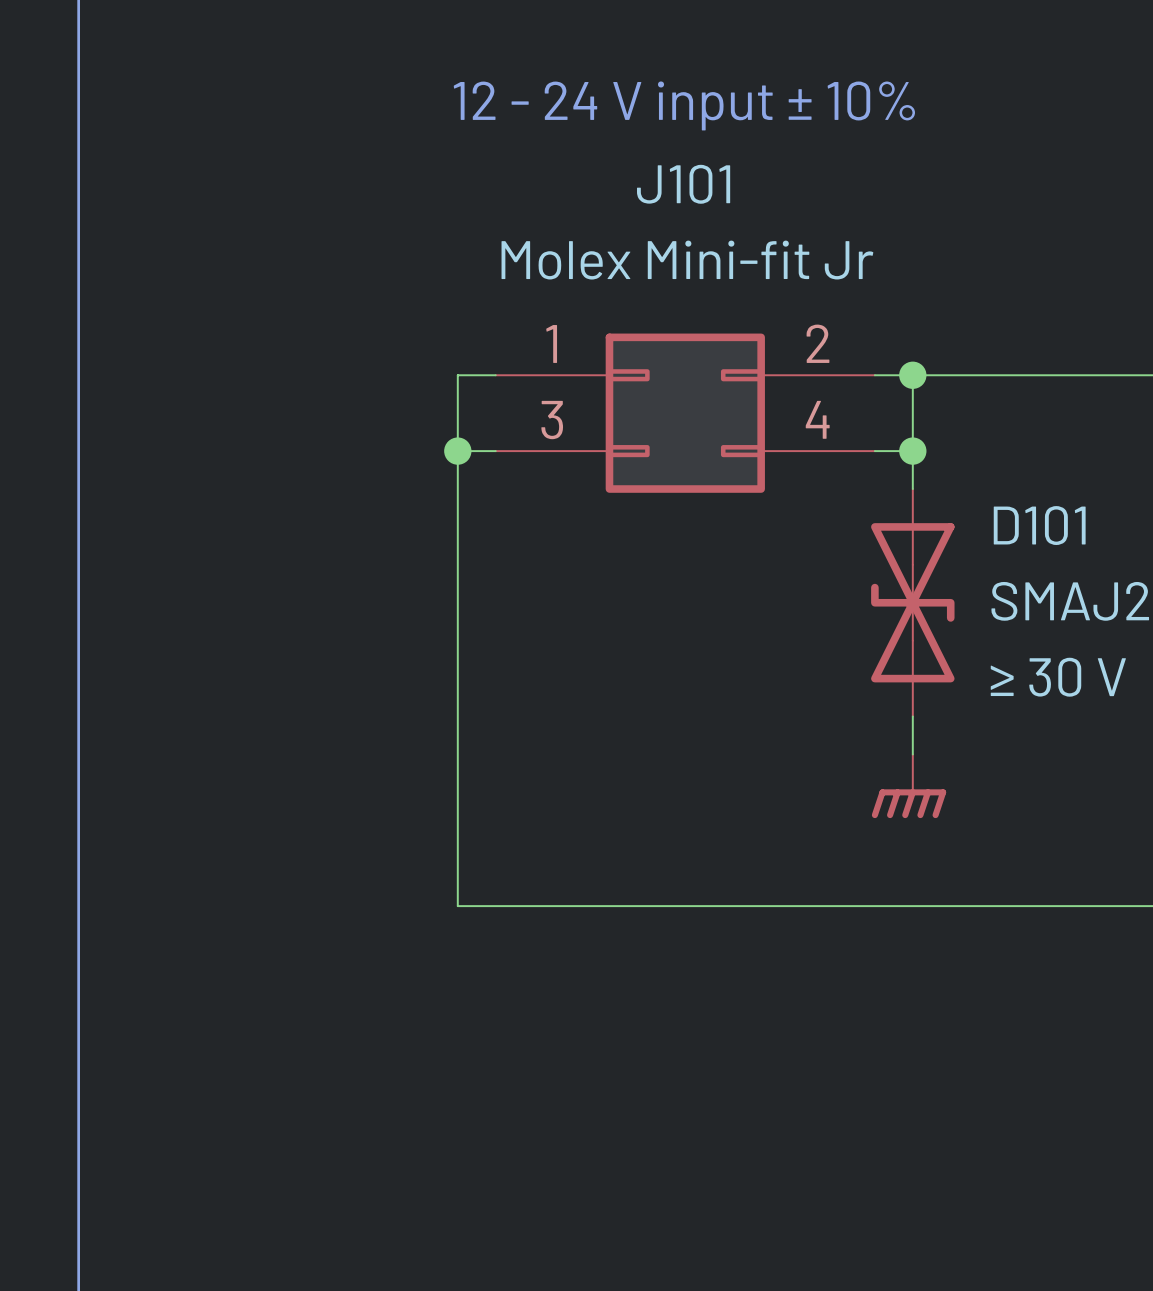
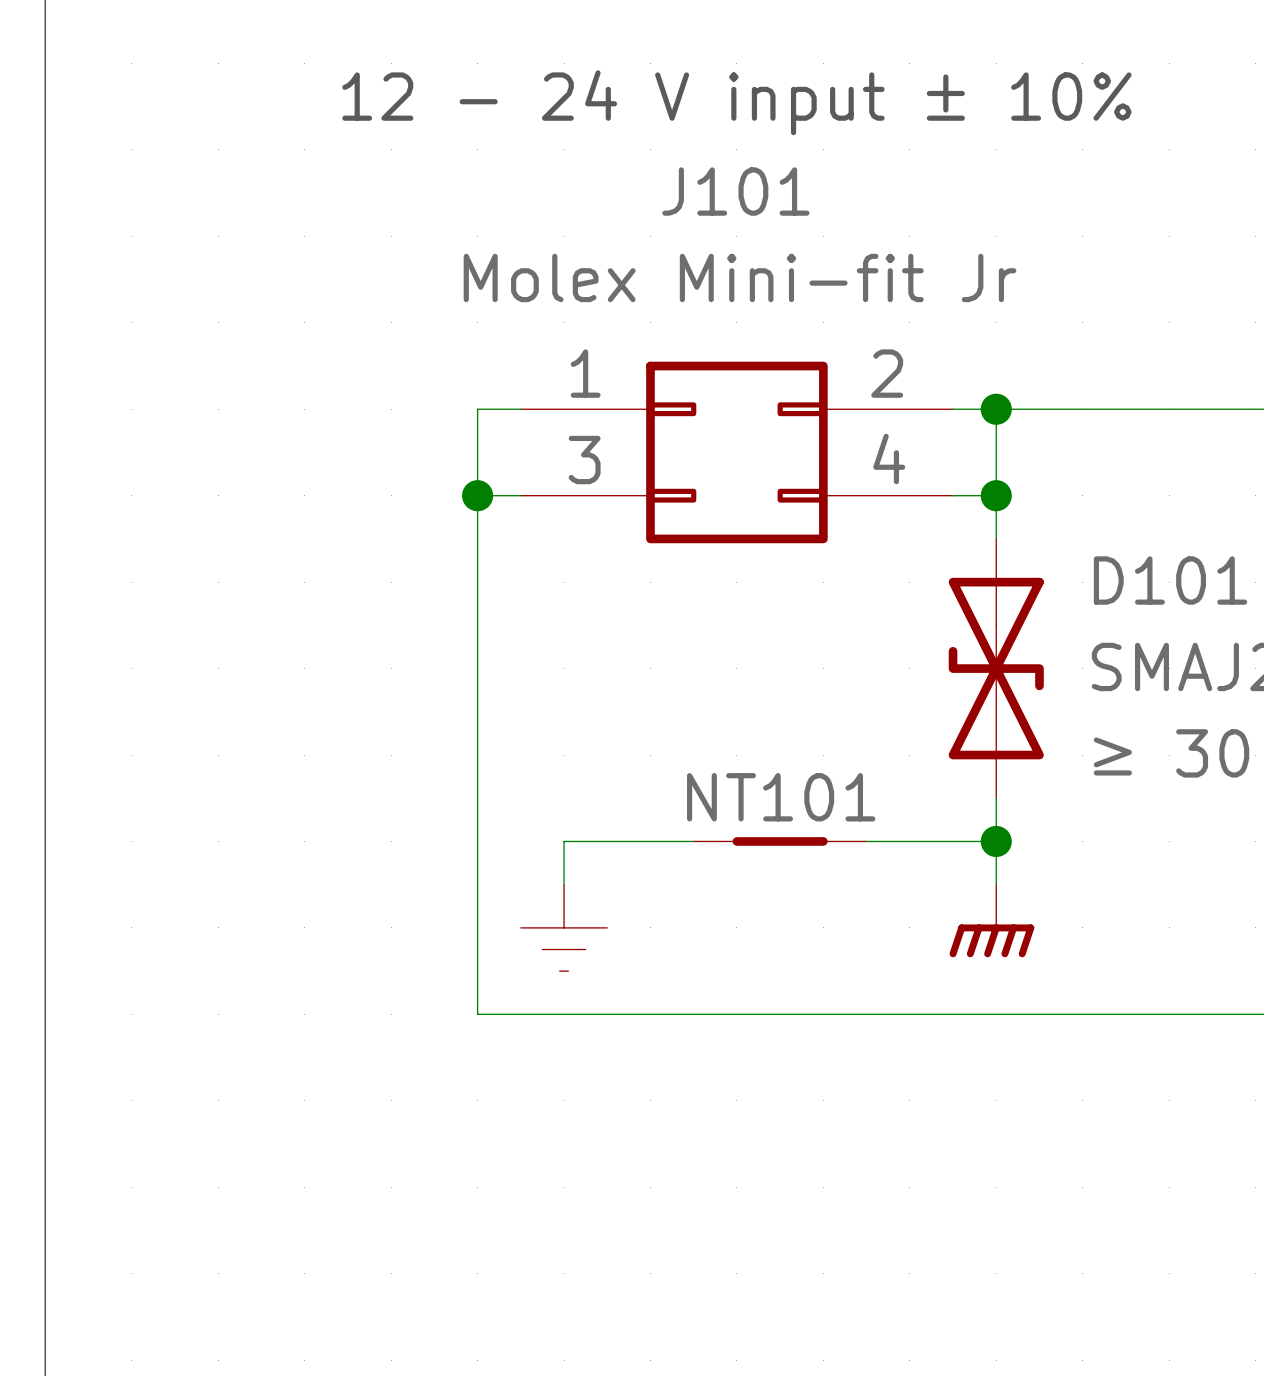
wire: none -> (693, 841) (564, 841) (564, 884)
NT101: none -> (780, 841)
wire: none -> (866, 841) (996, 841) (996, 884)
junction: none -> (996, 841)
power symbol position: (909, 786) -> (991, 920)
power symbol: none -> (564, 927)

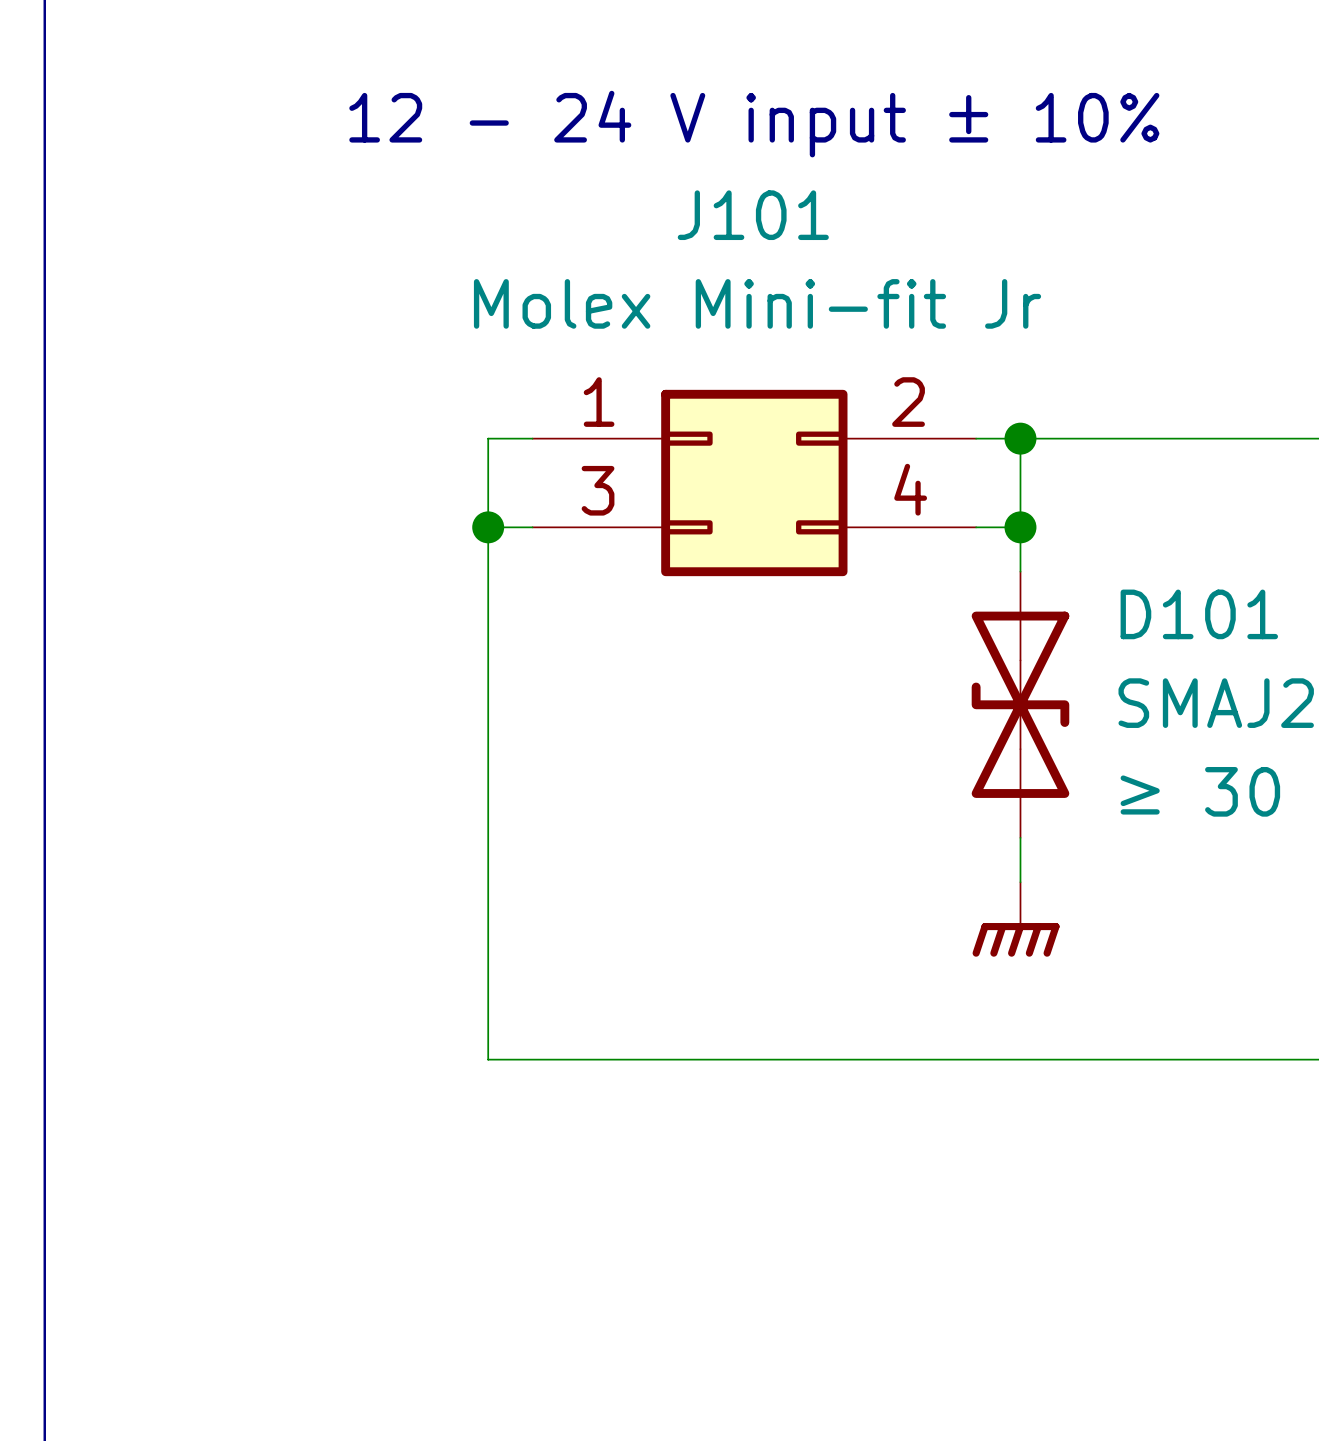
wire: (693, 841) (564, 841) (564, 884) -> none
NT101: (780, 841) -> none
wire: (866, 841) (996, 841) (996, 884) -> none
junction: (996, 841) -> none
power symbol position: (991, 920) -> (1016, 919)
power symbol: (564, 927) -> none

